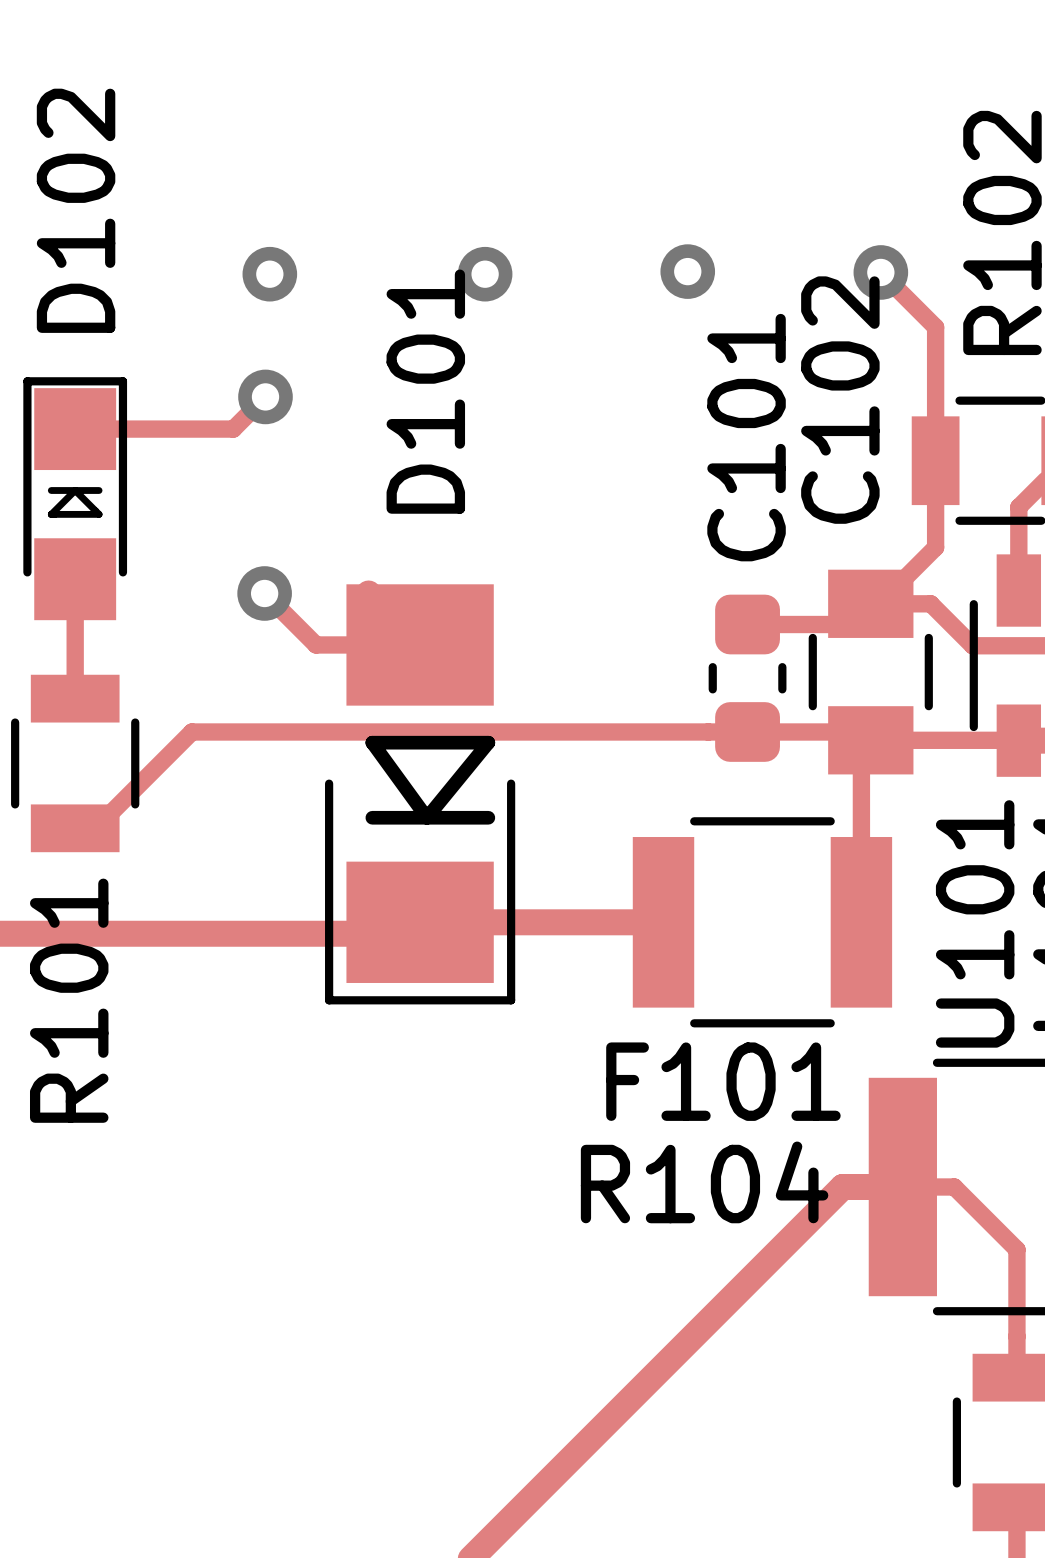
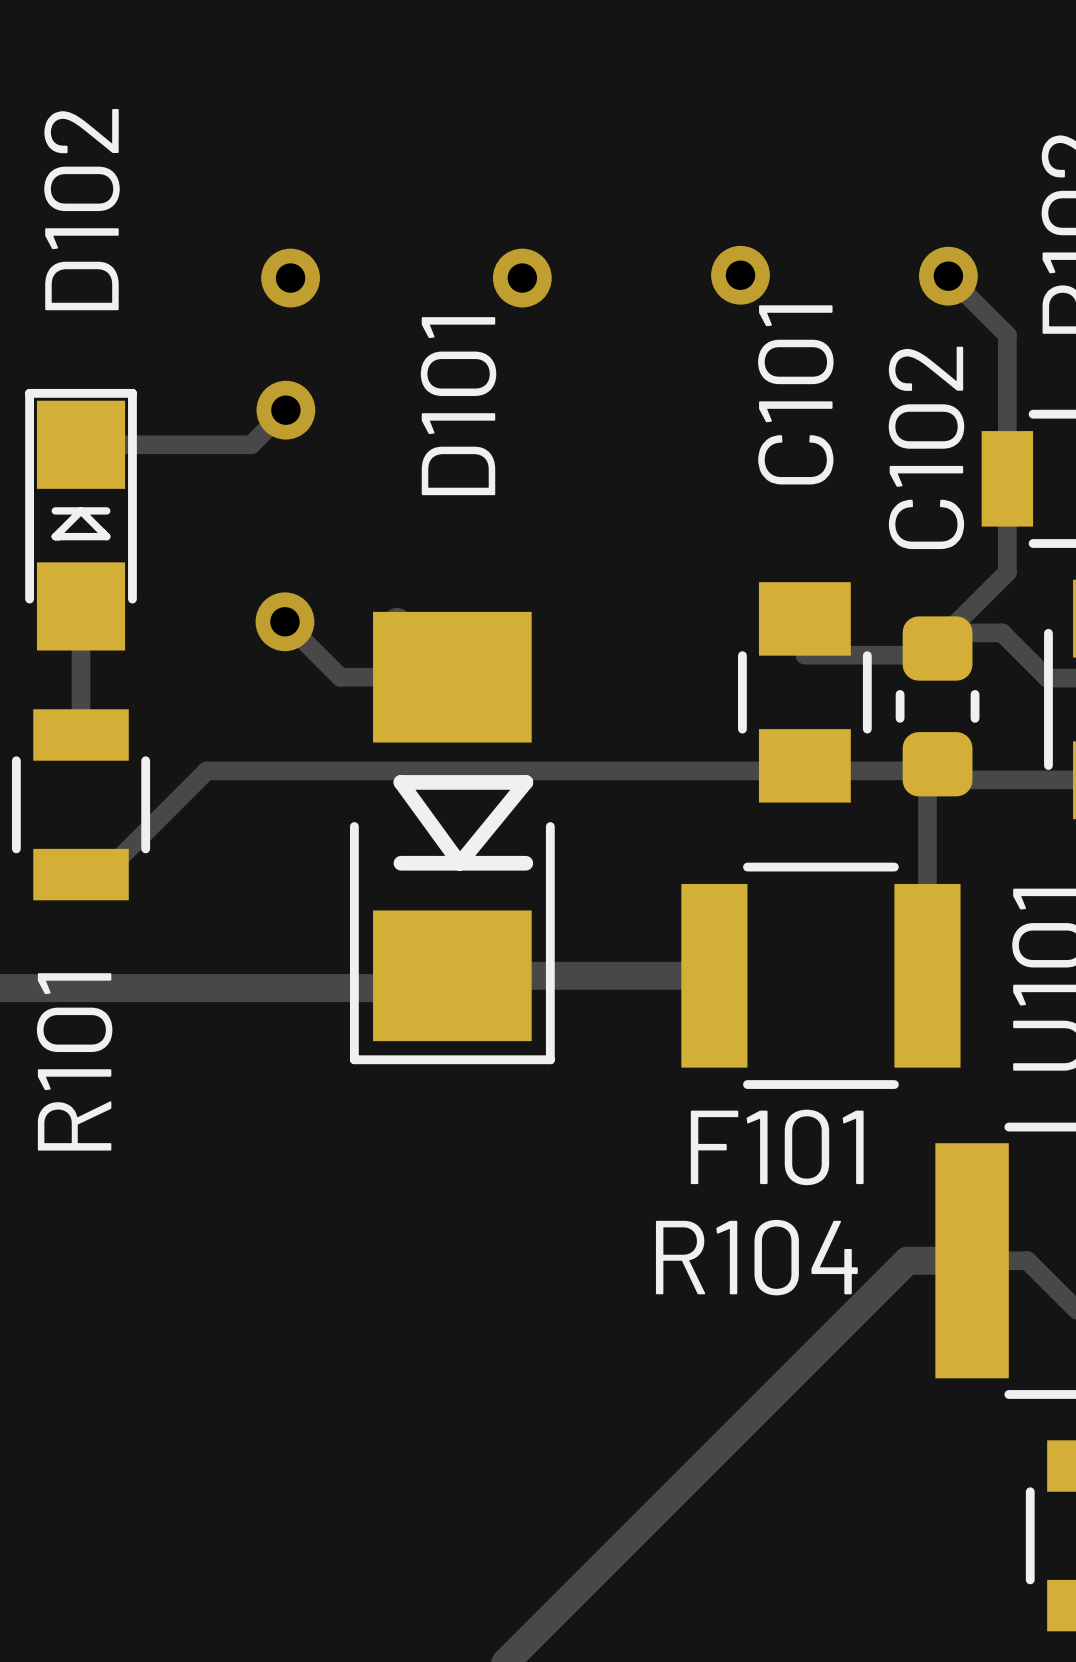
C102 name position: C102 (840, 400) -> C102 (926, 447)
C101 name position: C101 (746, 437) -> C101 (795, 394)
C102 footprint: [808, 569, 933, 775] -> [895, 616, 980, 797]
C101 footprint: [708, 594, 787, 762] -> [738, 582, 872, 803]

